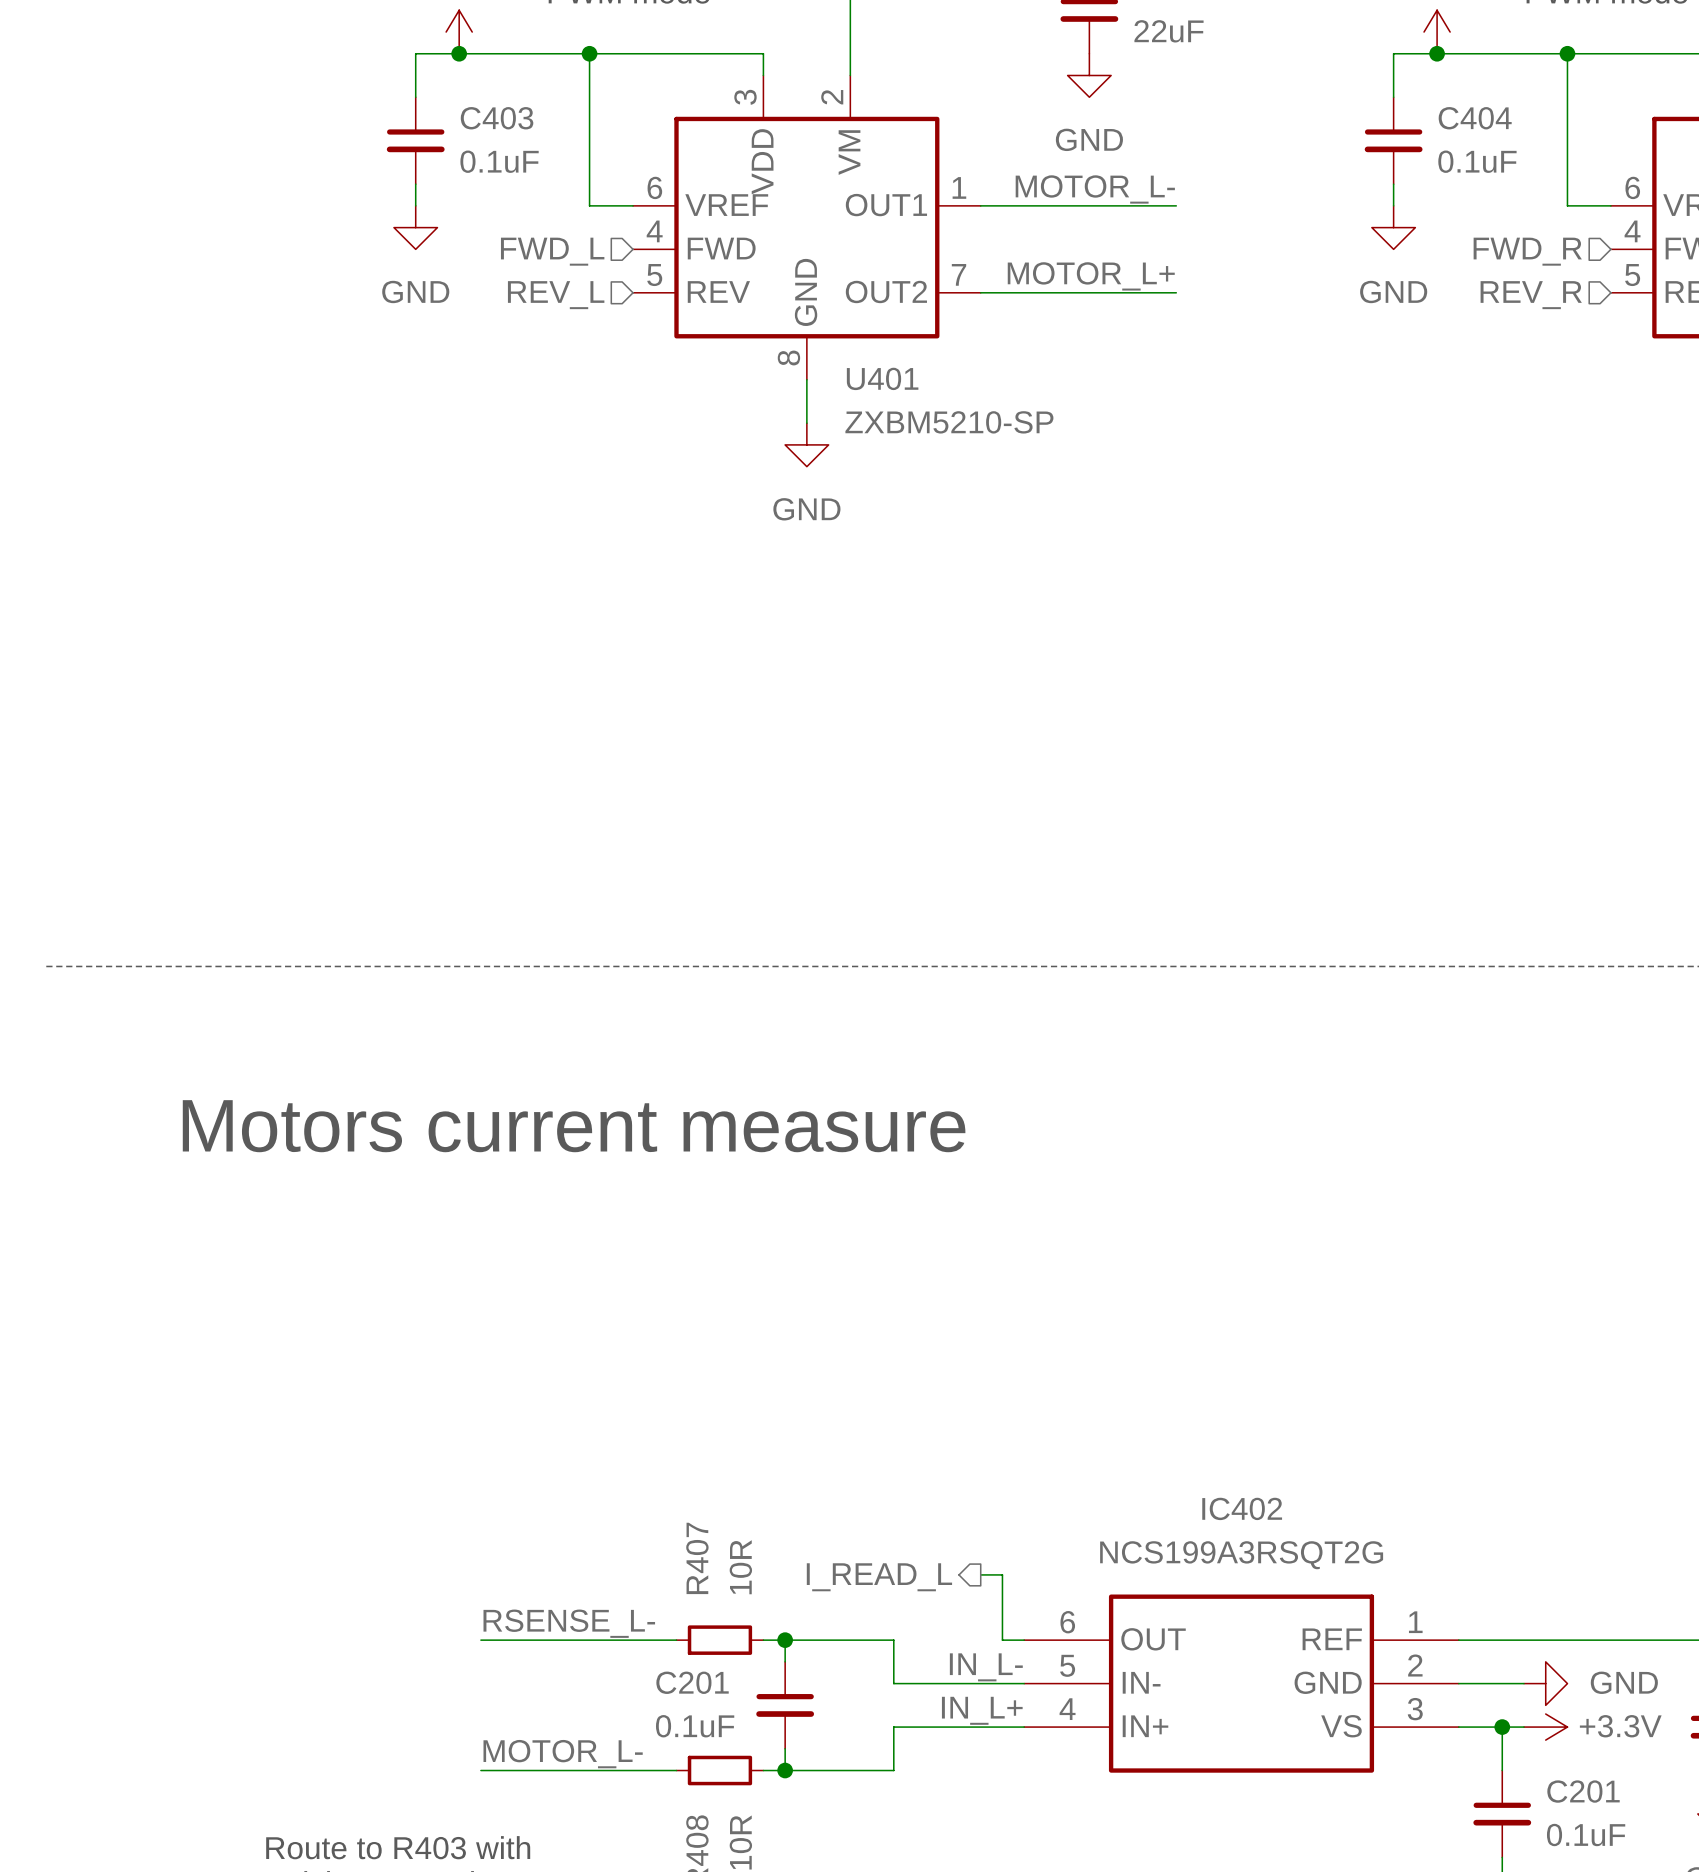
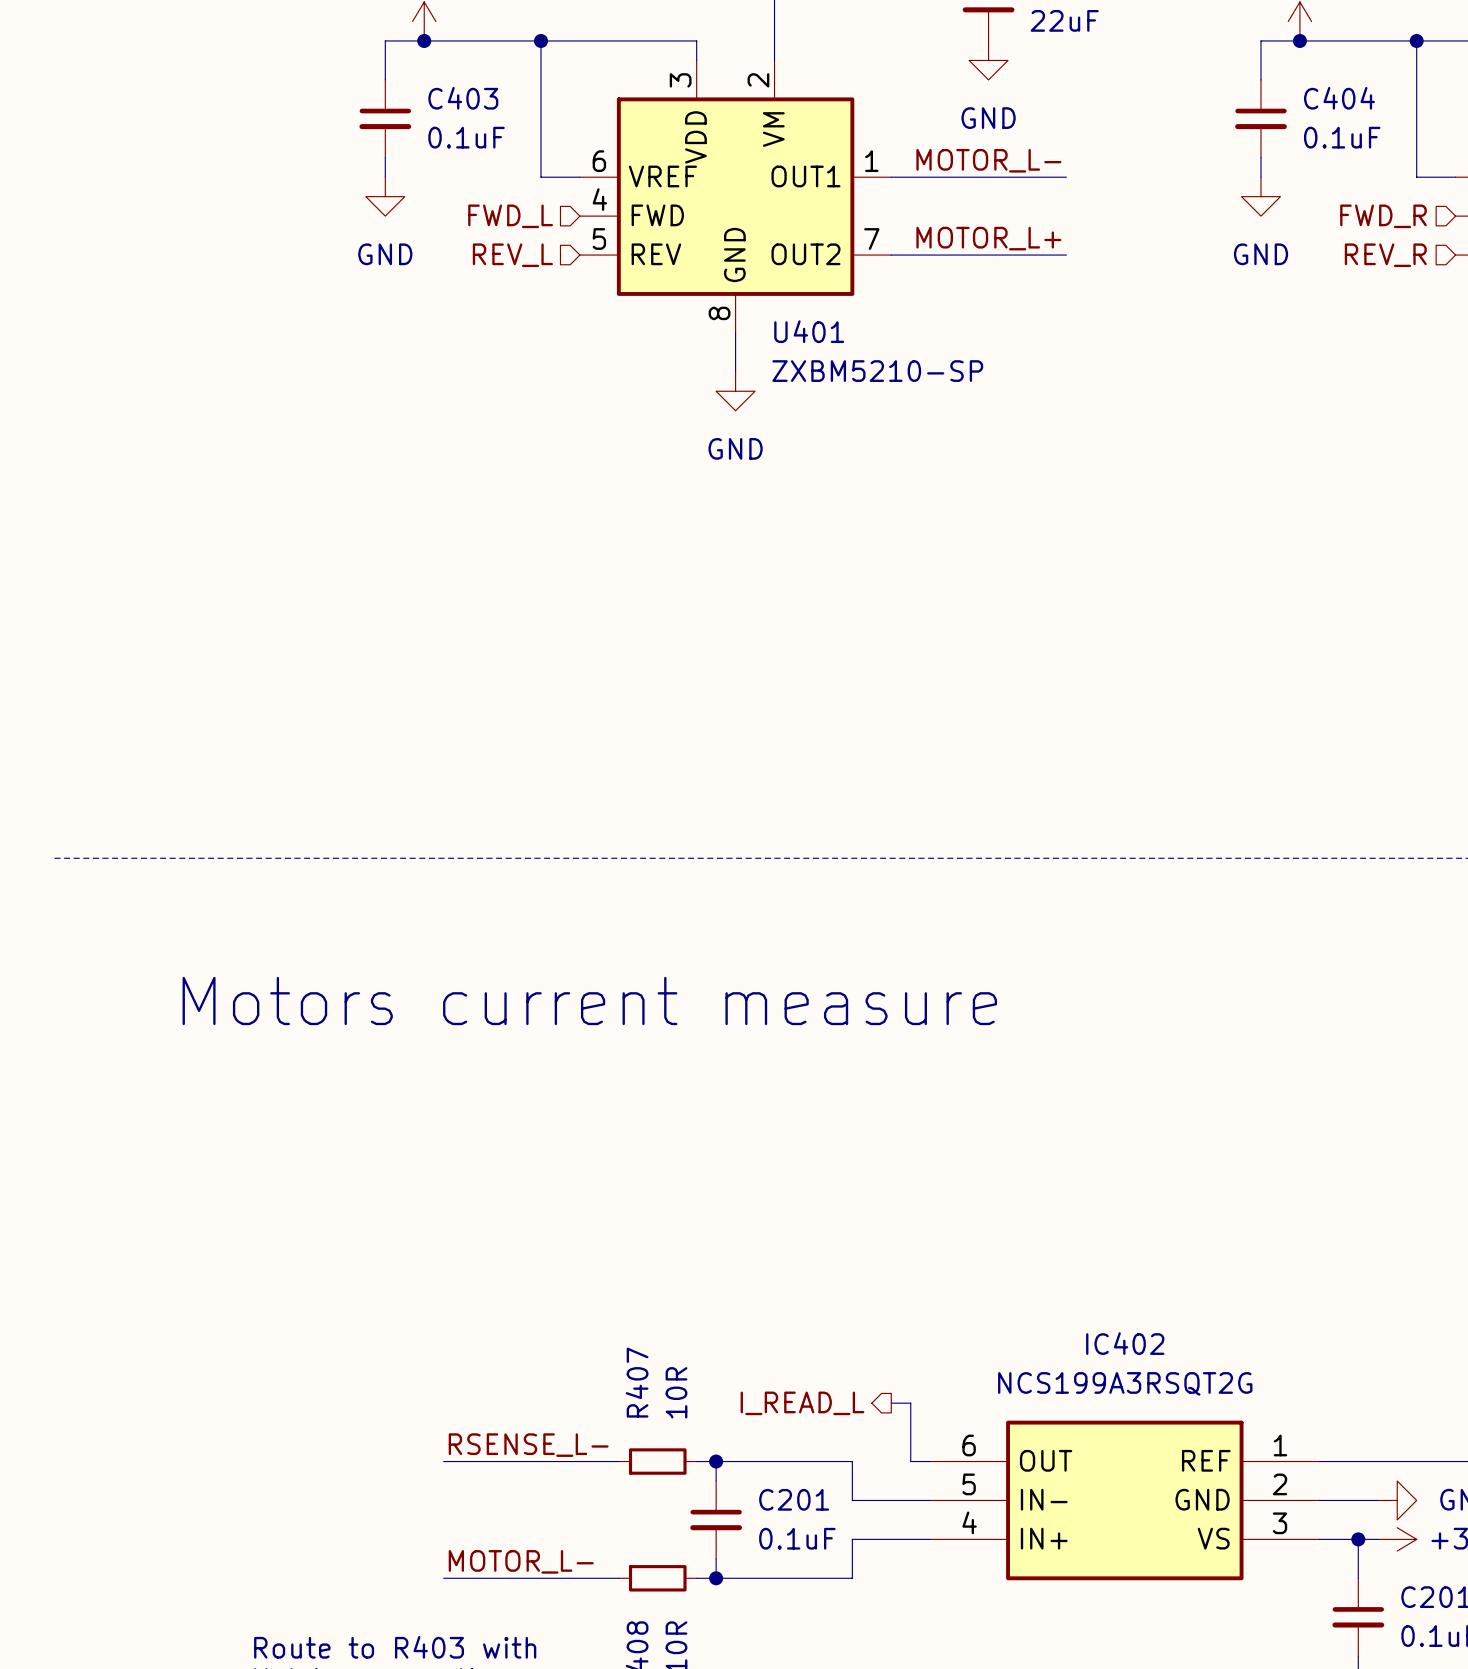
wire: (893, 1640) (893, 1683) (937, 1683) -> (813, 1461) (852, 1461) (852, 1500)
label: IN_L- (986, 1667) -> none
C201 name position: C201 (692, 1682) -> C201 (794, 1499)
label: IN_L+ (982, 1710) -> none
C201 value position: 0.1uF (695, 1726) -> 0.1uF (797, 1538)
wire: (937, 1727) (893, 1727) (893, 1770) -> (852, 1539) (852, 1578) (813, 1578)

